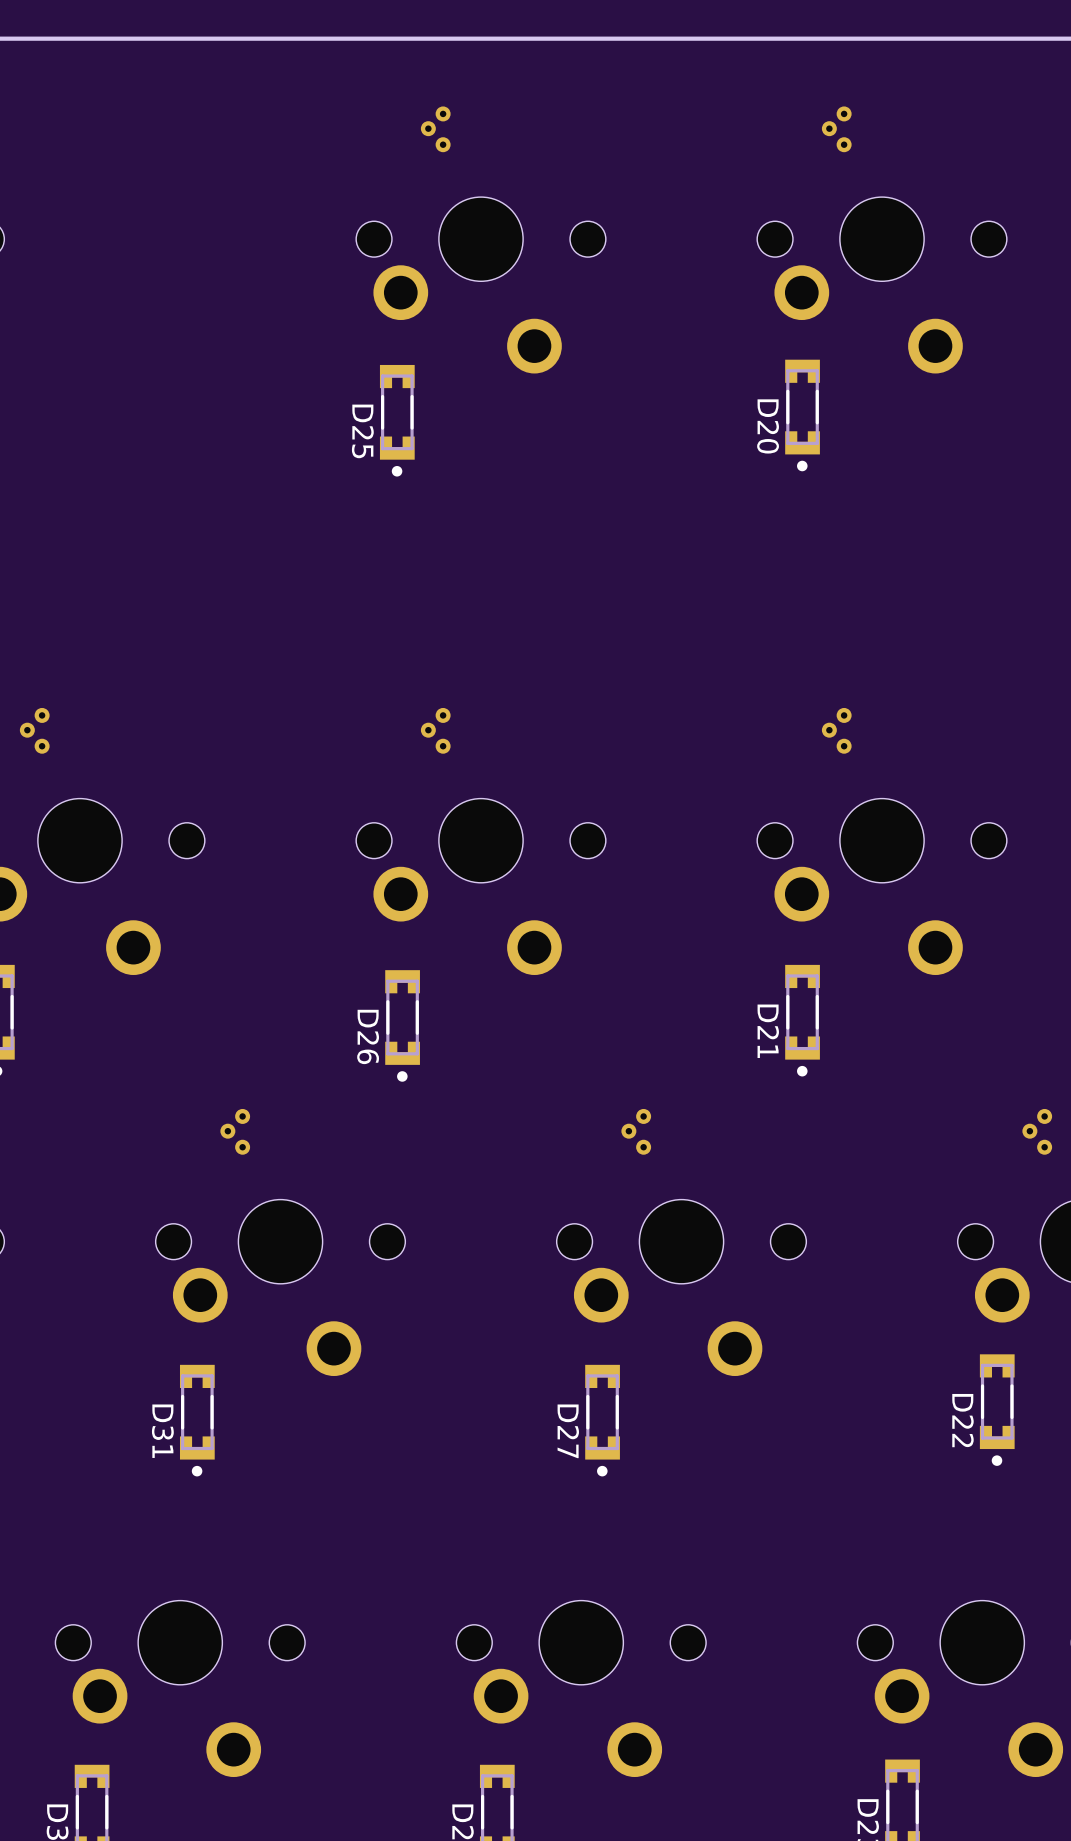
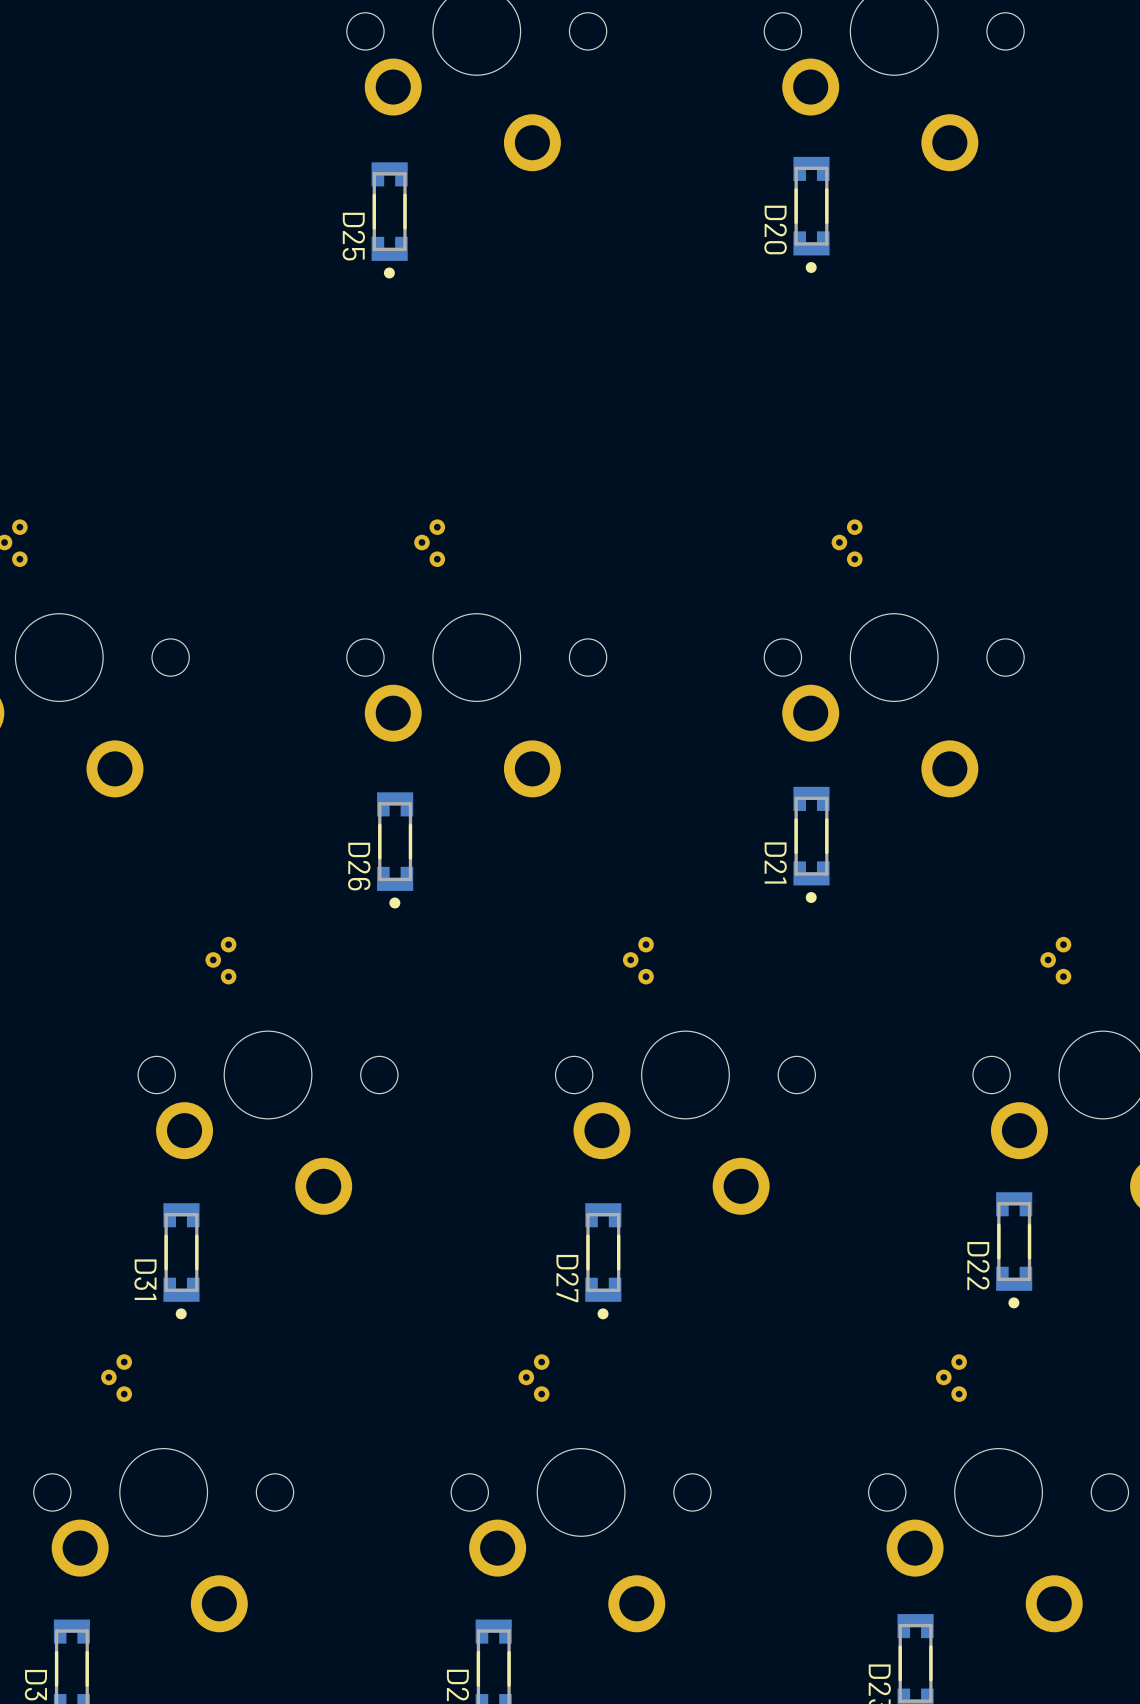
part: none -> (116, 1378)
part: none -> (534, 1378)
part: none -> (951, 1378)

